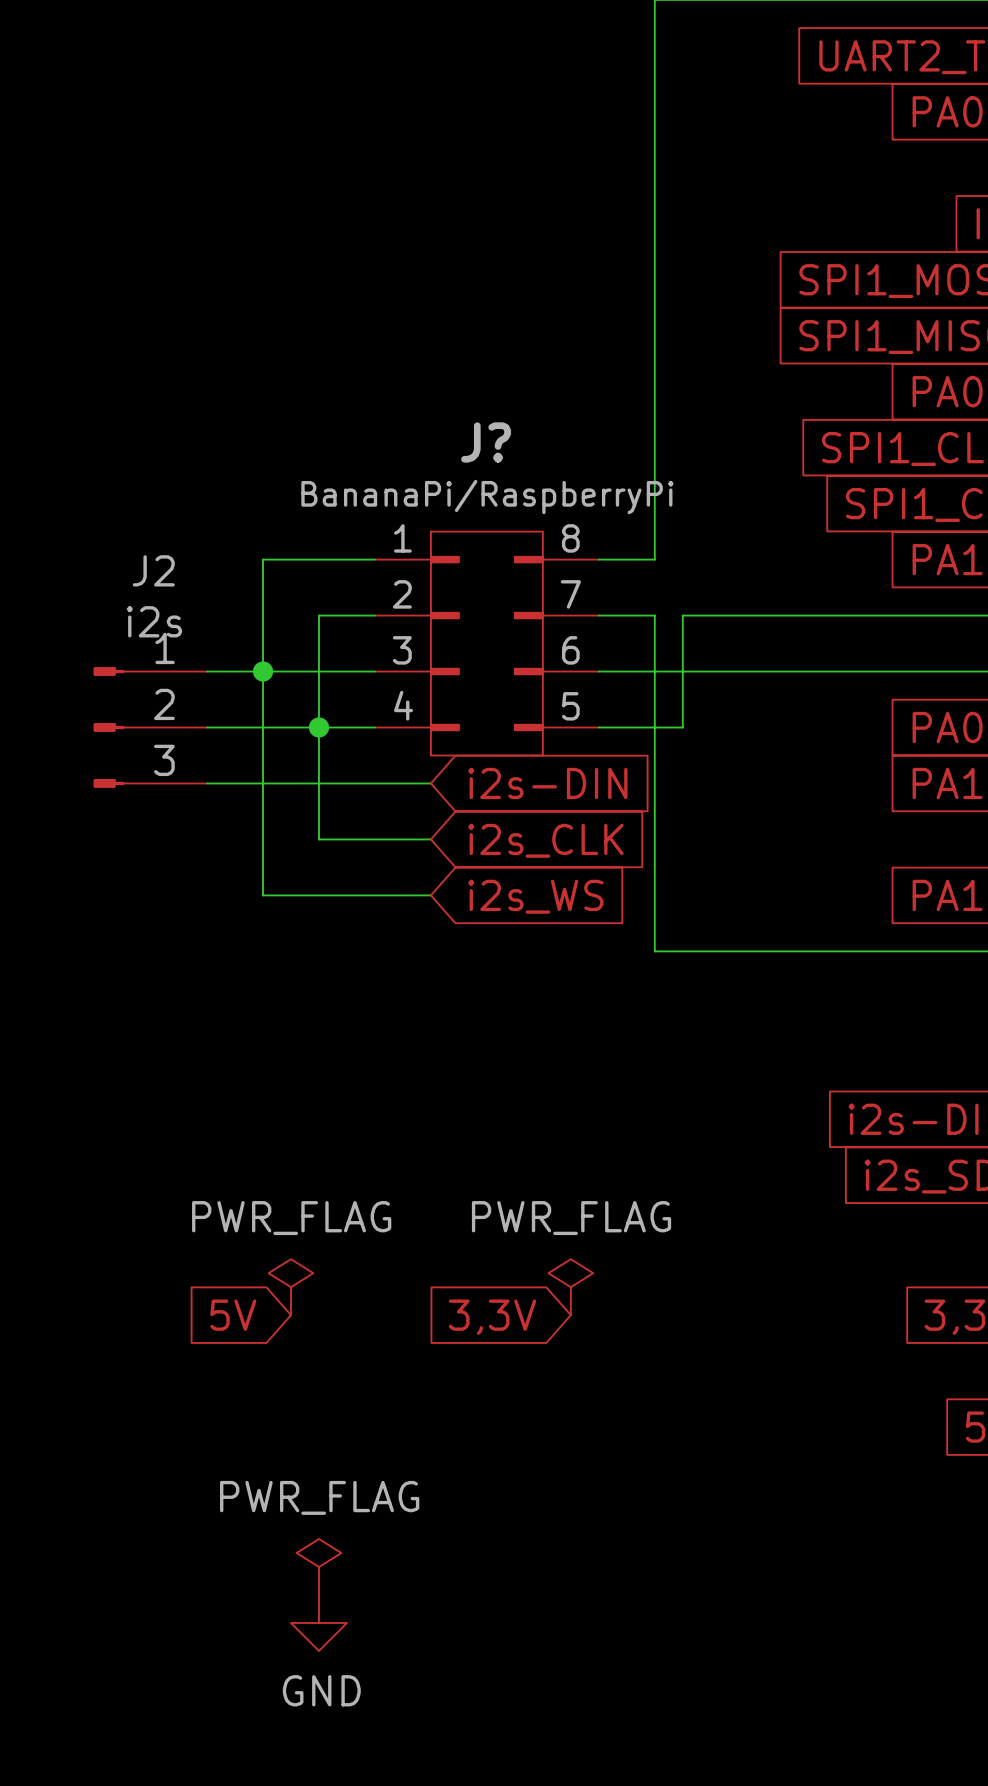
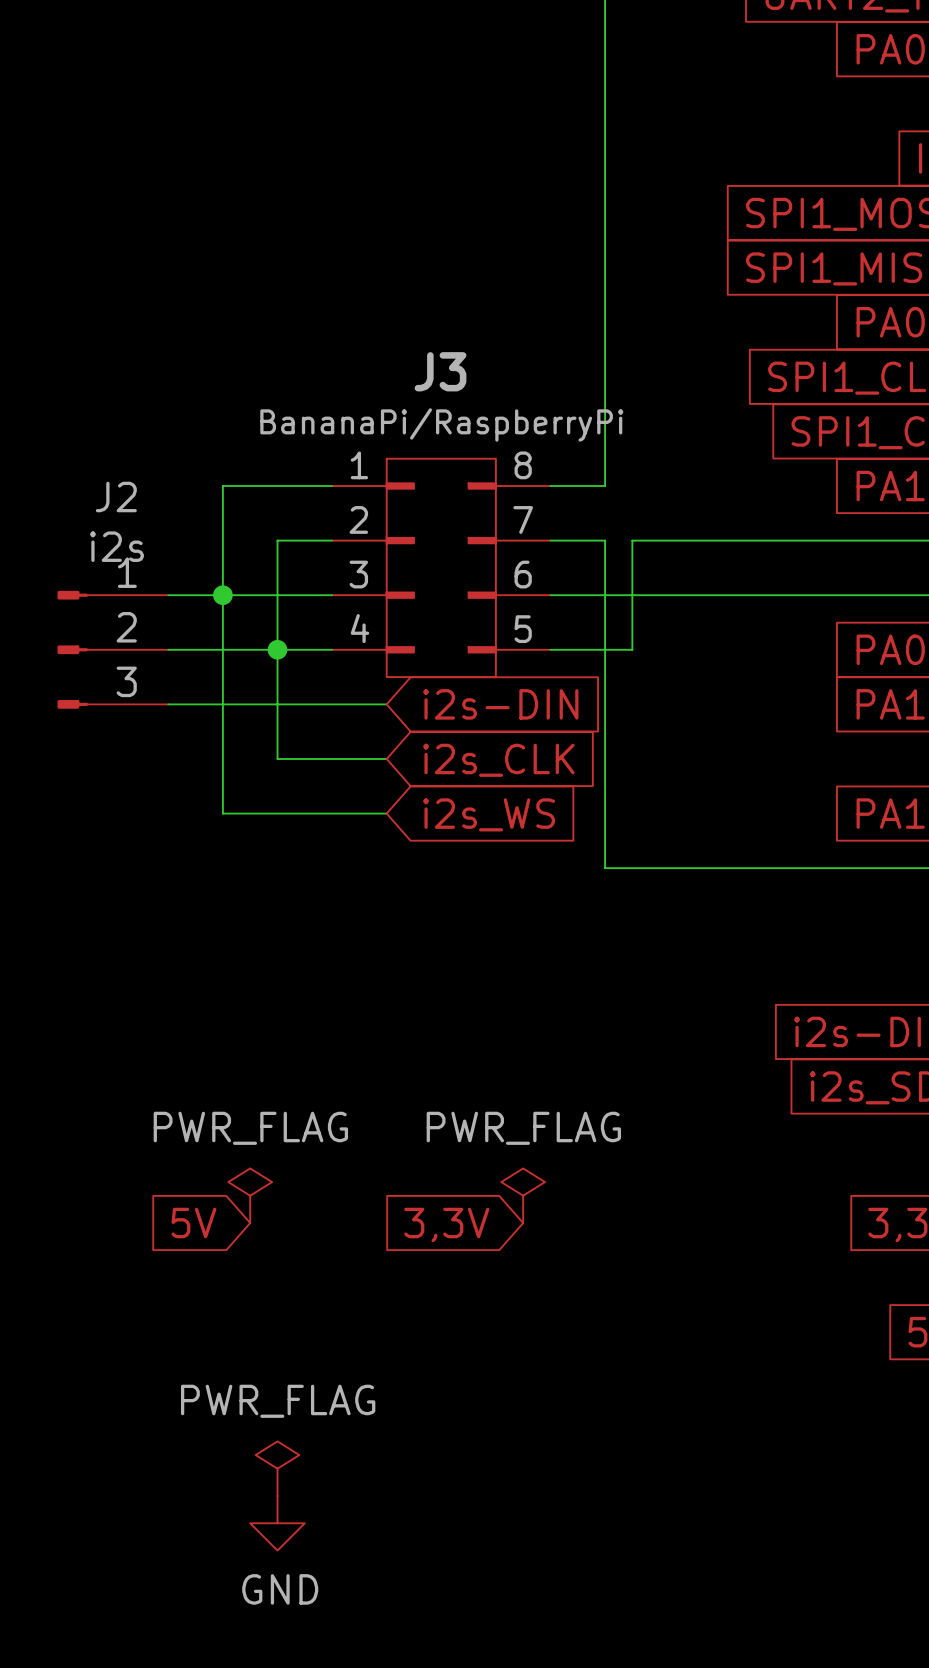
J? name: J? (486, 442) -> J3 (440, 371)

